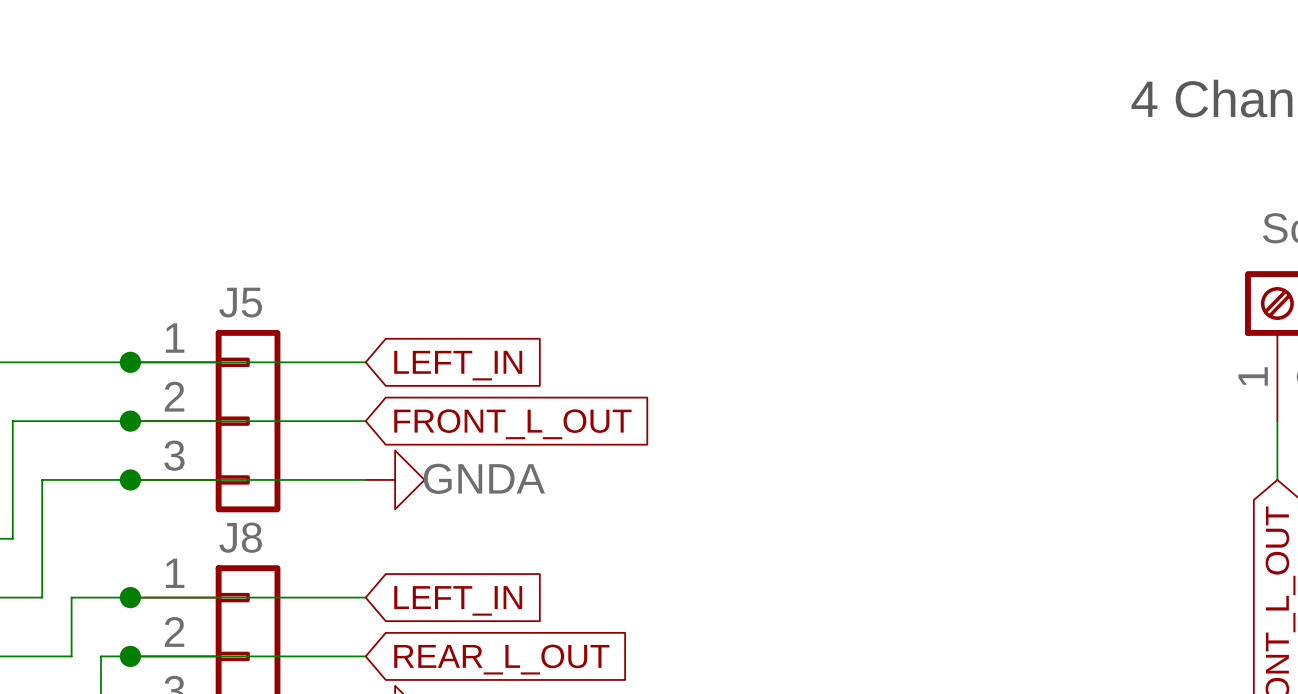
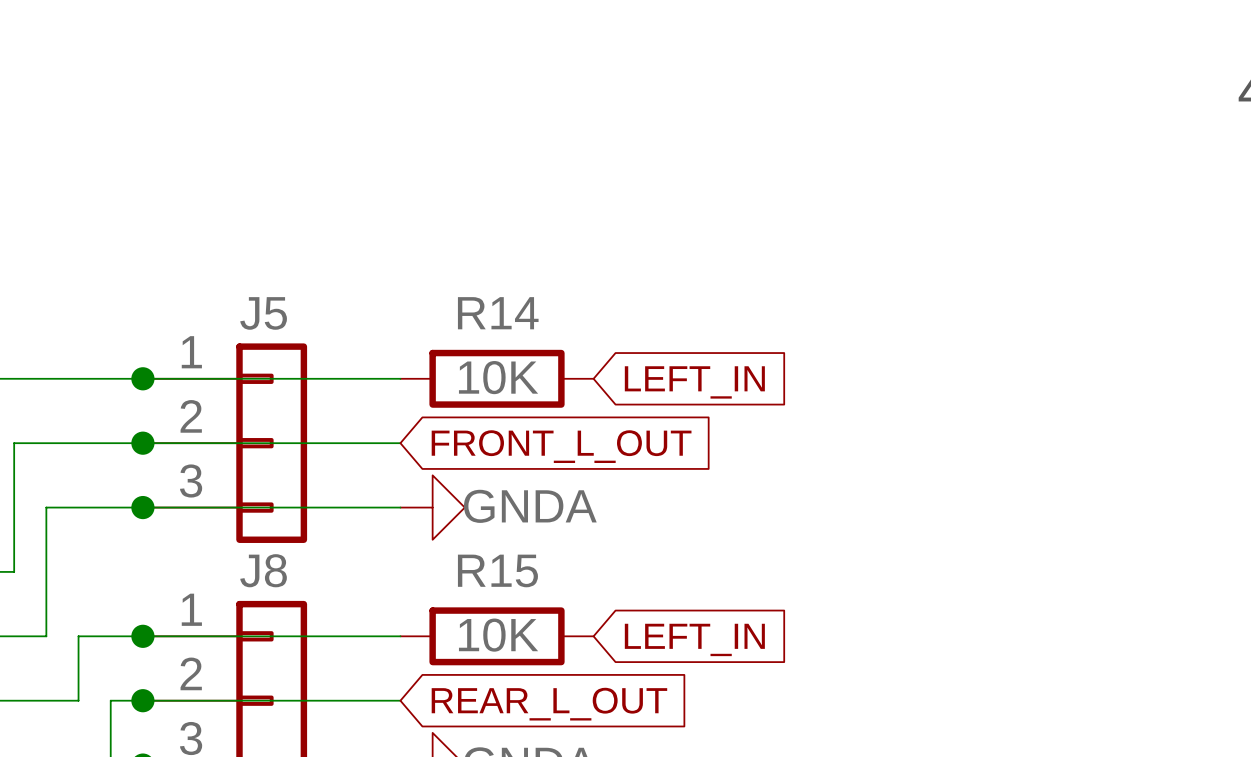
R14: none -> 10K (497, 378)
global label position: LEFT_IN (458, 365) -> LEFT_IN (694, 382)
R15: none -> 10K (497, 636)
global label position: LEFT_IN (458, 600) -> LEFT_IN (694, 639)

